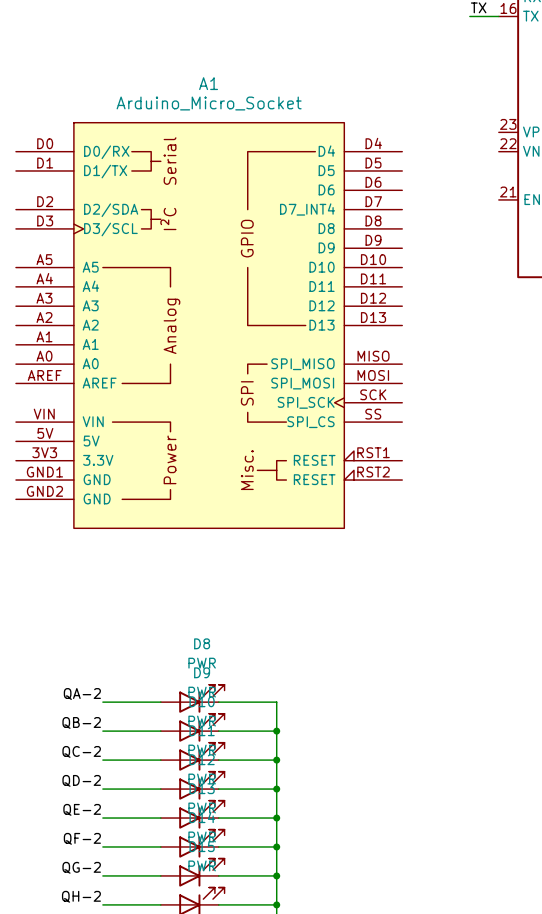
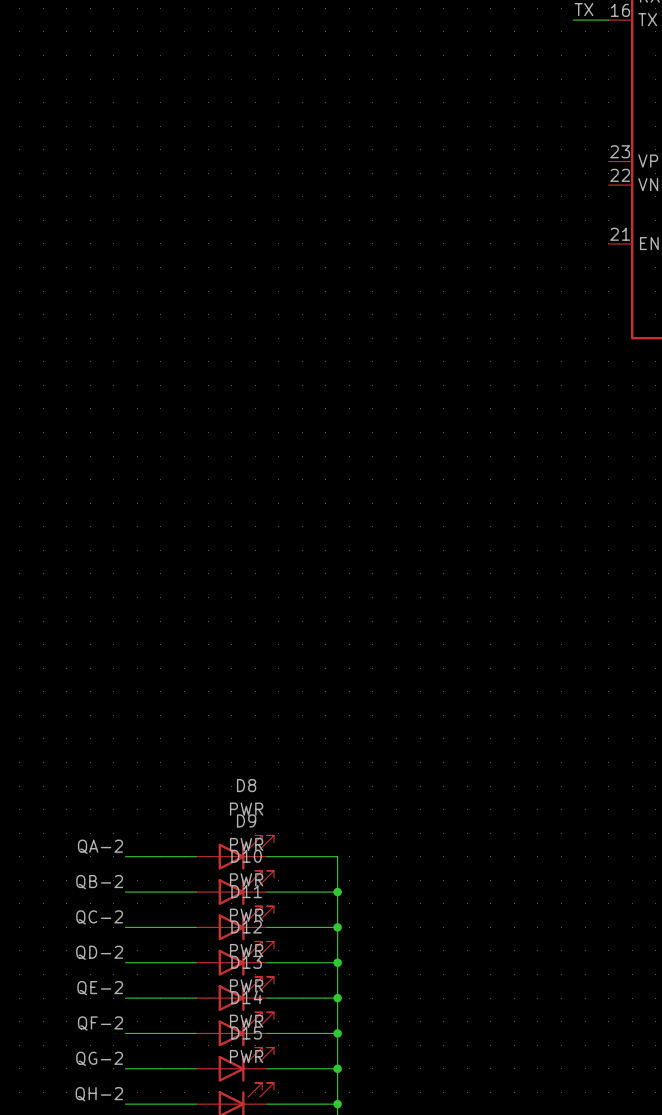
A1: Arduino_Micro_Socket (209, 325) -> none

